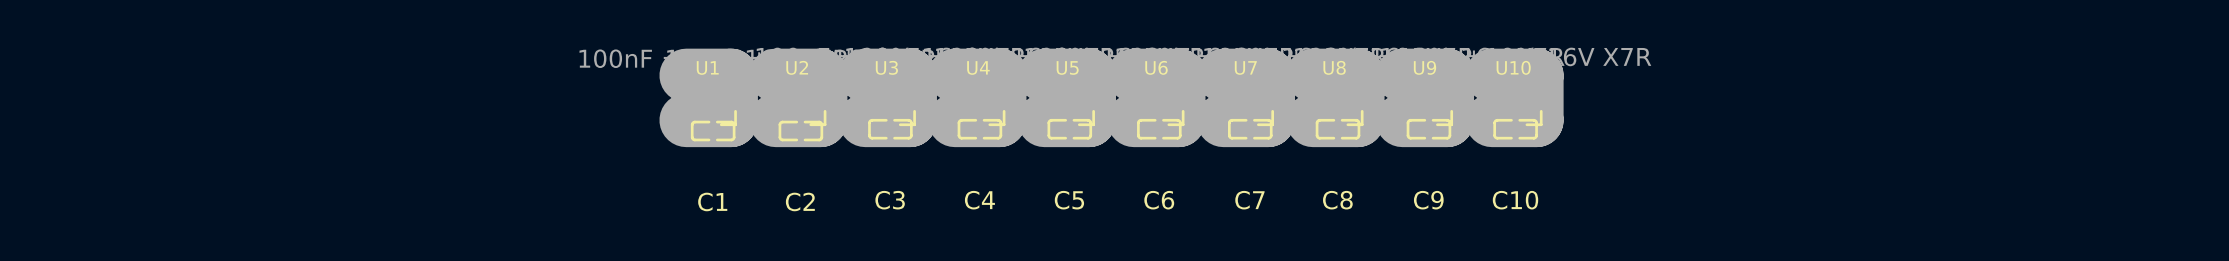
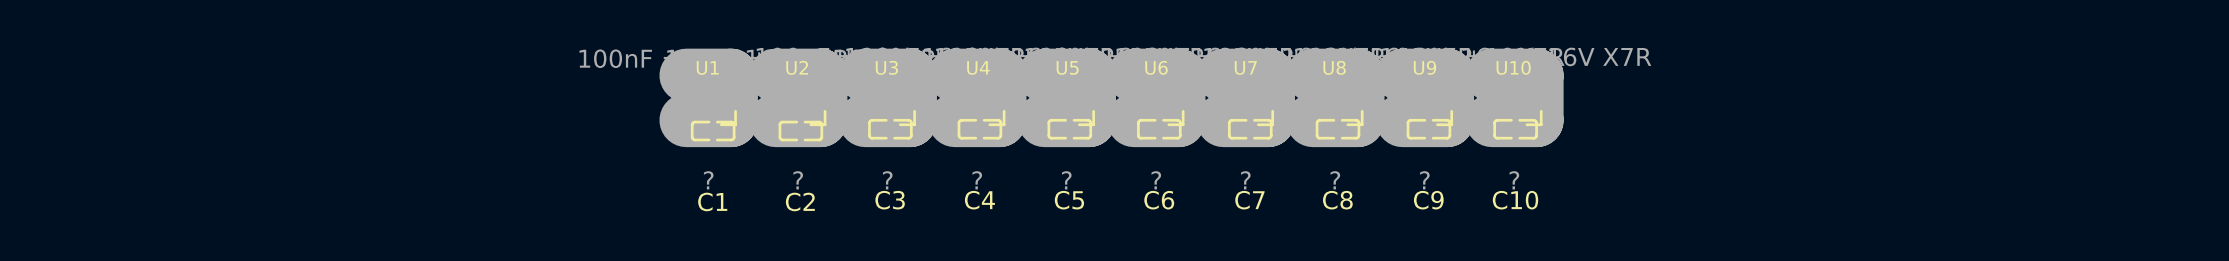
part value: none -> ? (708, 180)
part value: none -> ? (798, 180)
part value: none -> ? (887, 180)
part value: none -> ? (977, 180)
part value: none -> ? (1066, 180)
part value: none -> ? (1156, 180)
part value: none -> ? (1245, 180)
part value: none -> ? (1335, 180)
part value: none -> ? (1424, 180)
part value: none -> ? (1514, 180)

